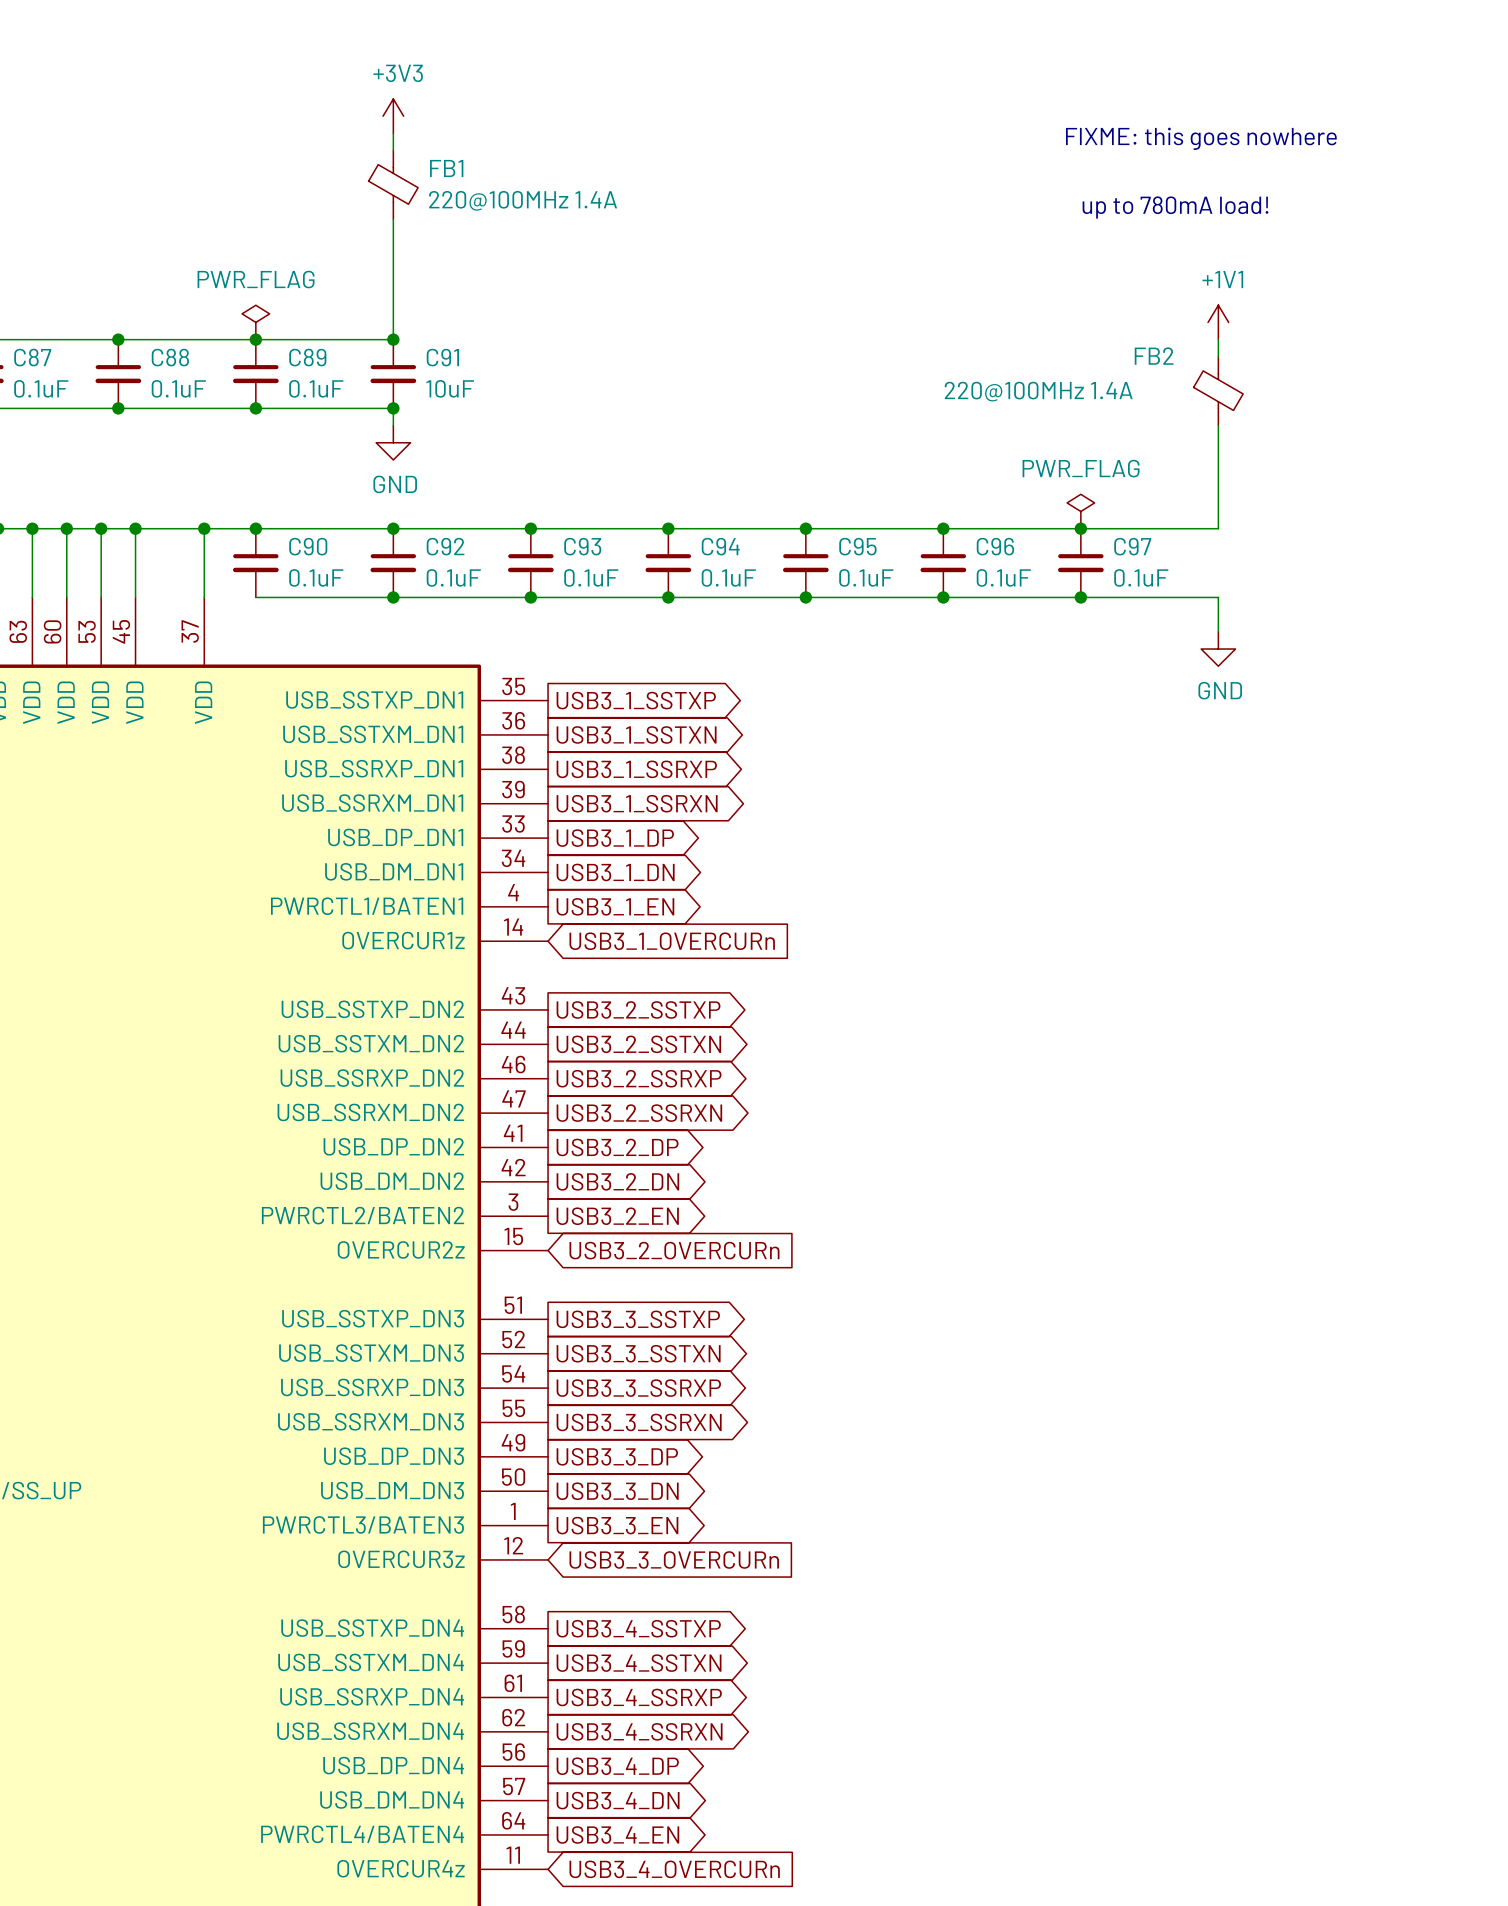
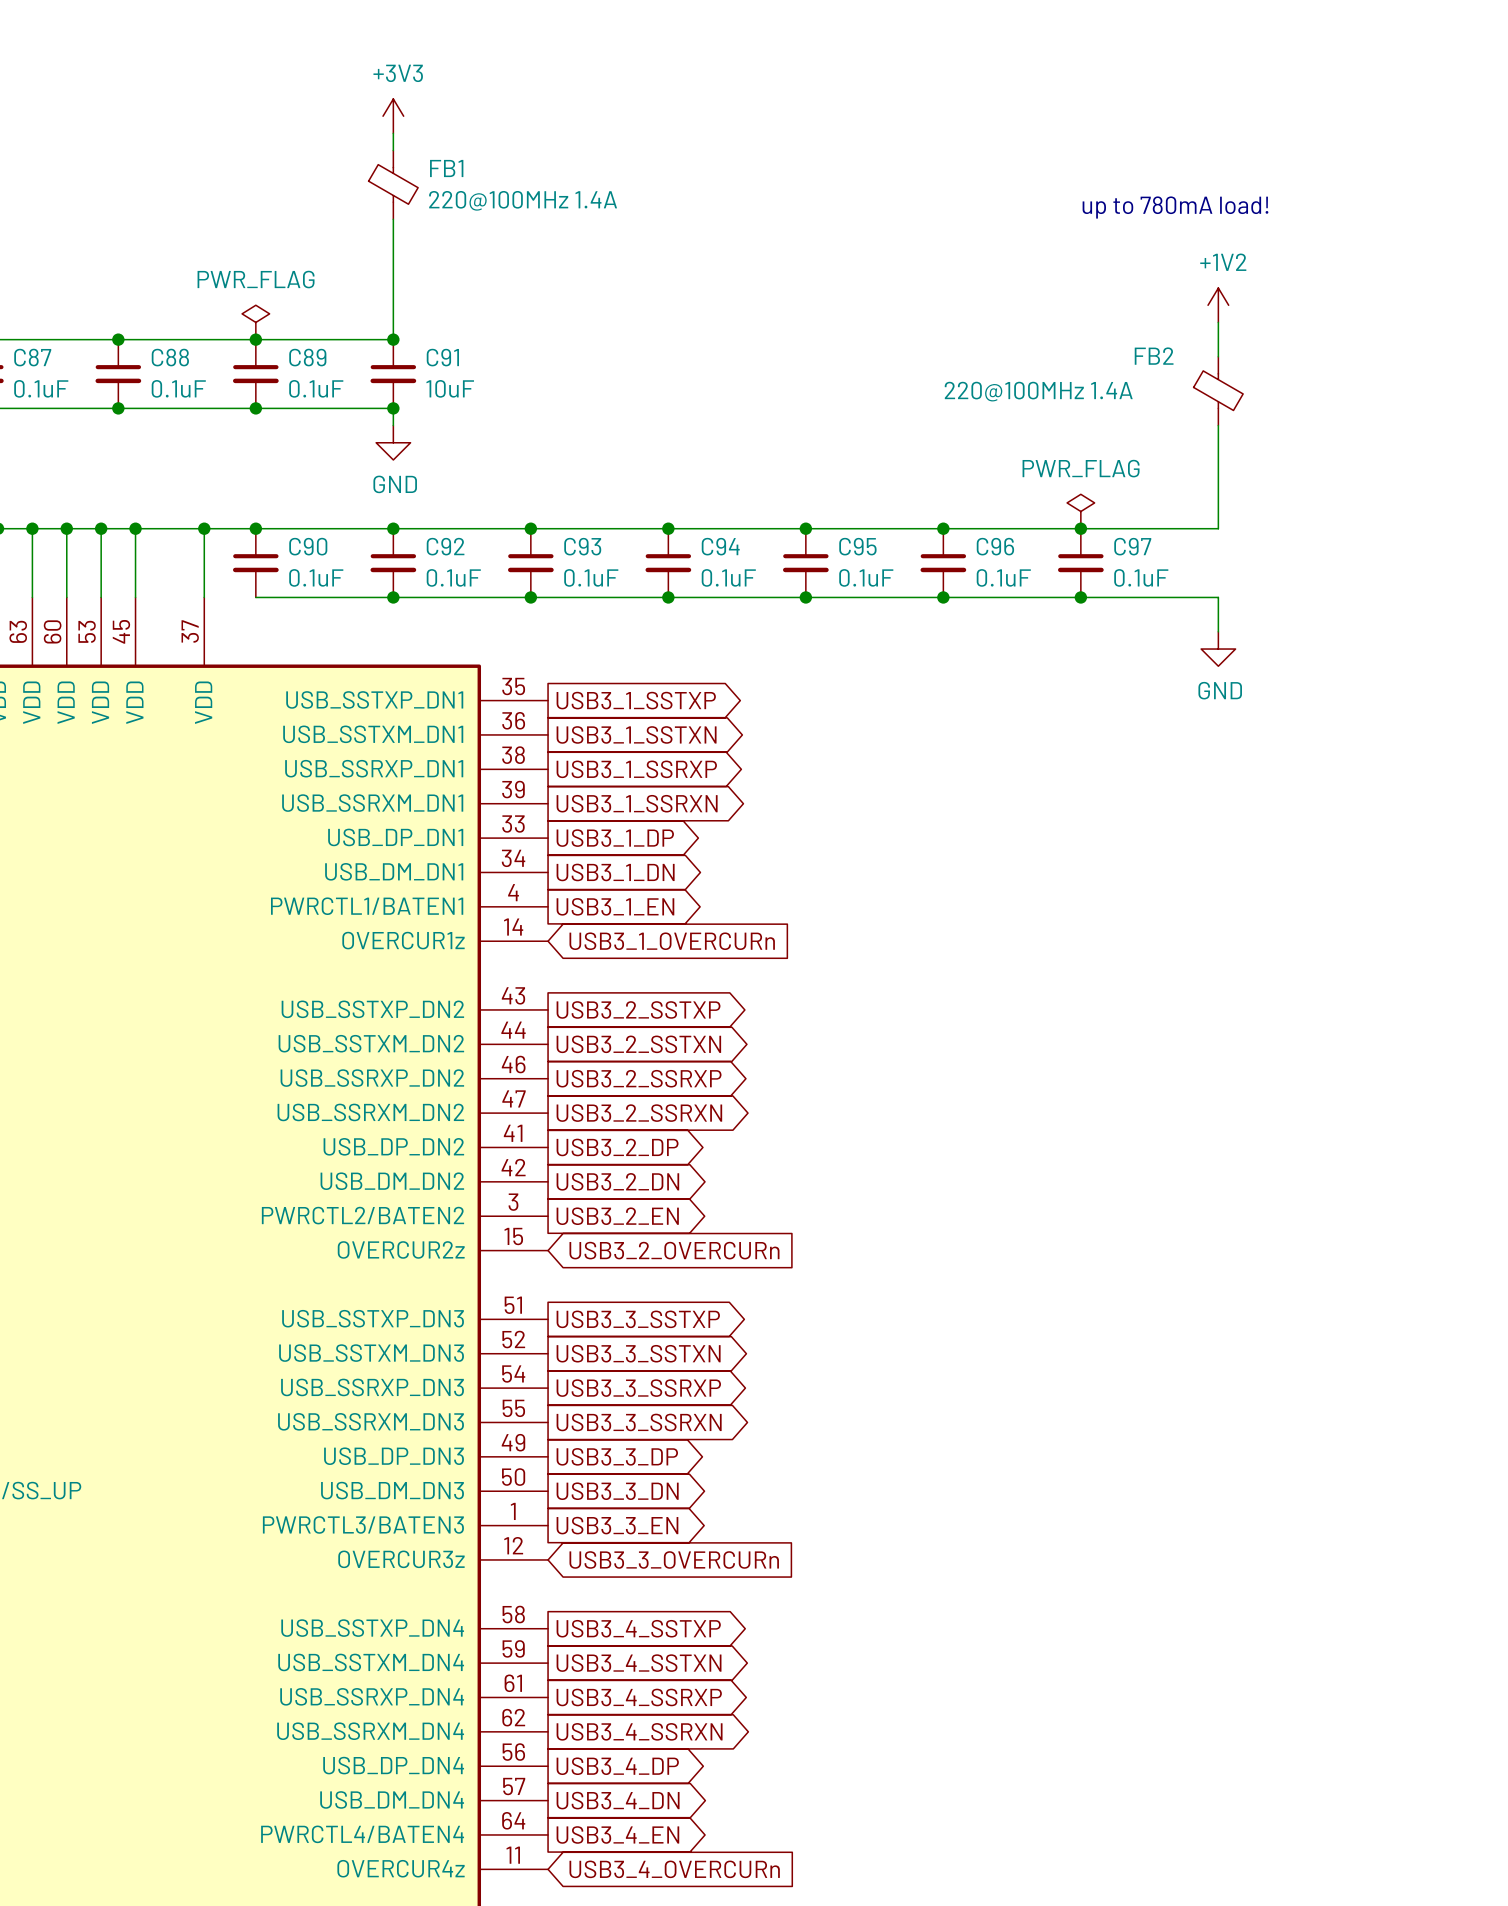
text: FIXME: this goes nowhere (1201, 138) -> none
power symbol: none -> +1V2 (1218, 305)
power symbol: +1V1 (1218, 322) -> none

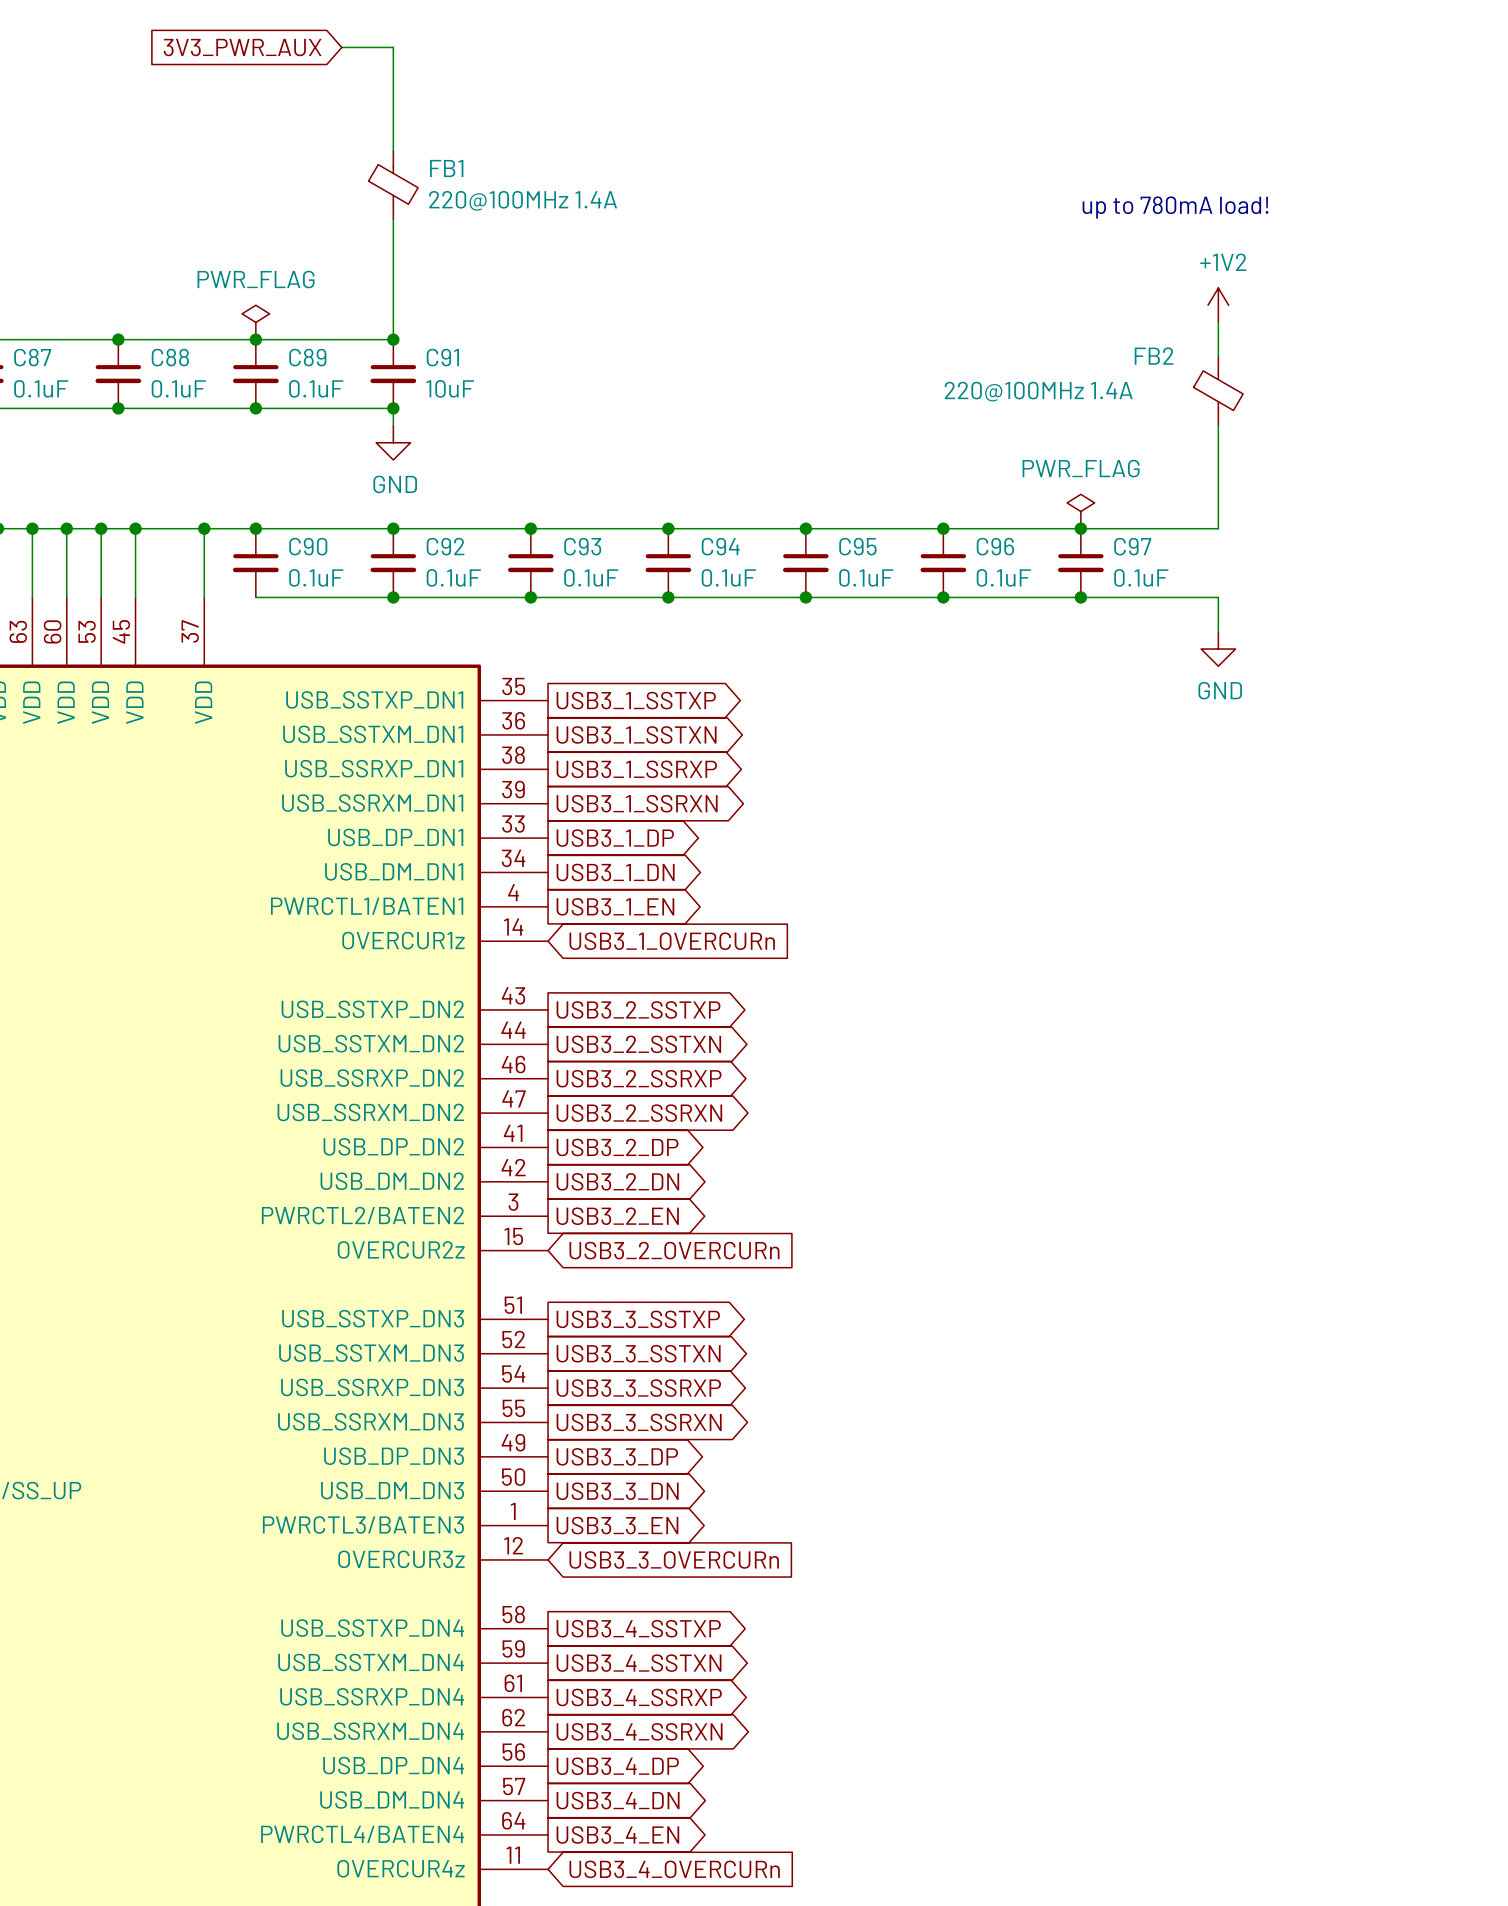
global label: none -> 3V3_PWR_AUX (242, 47)
wire: none -> (341, 47) (393, 47) (393, 133)
power symbol: +3V3 (393, 116) -> none

